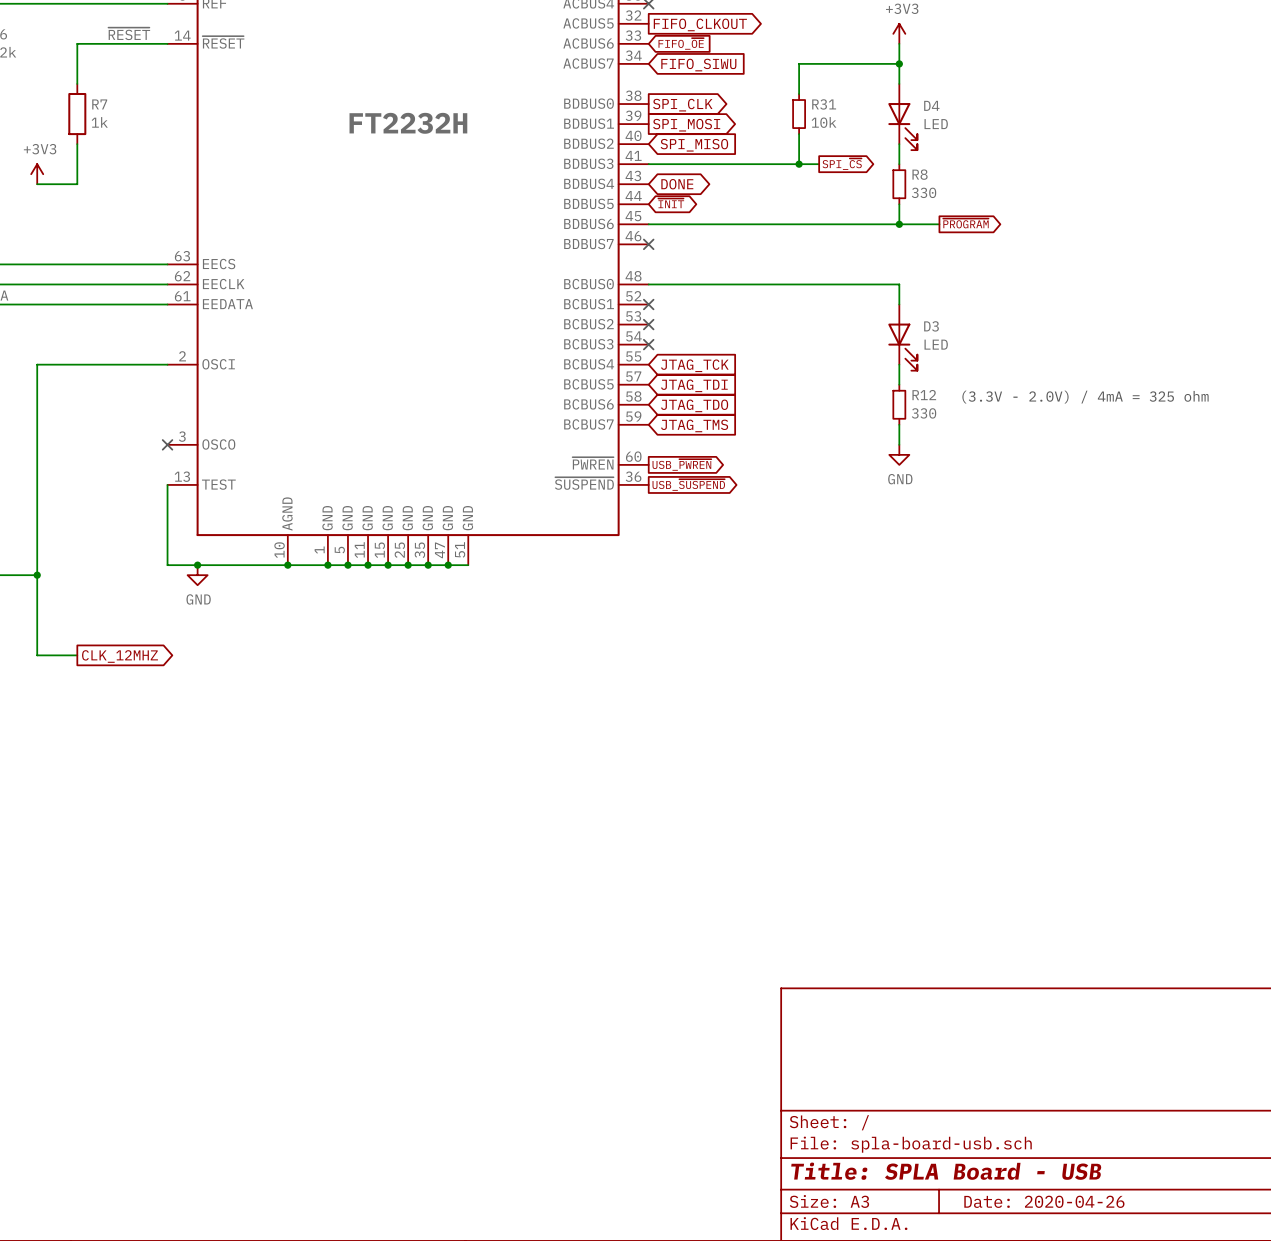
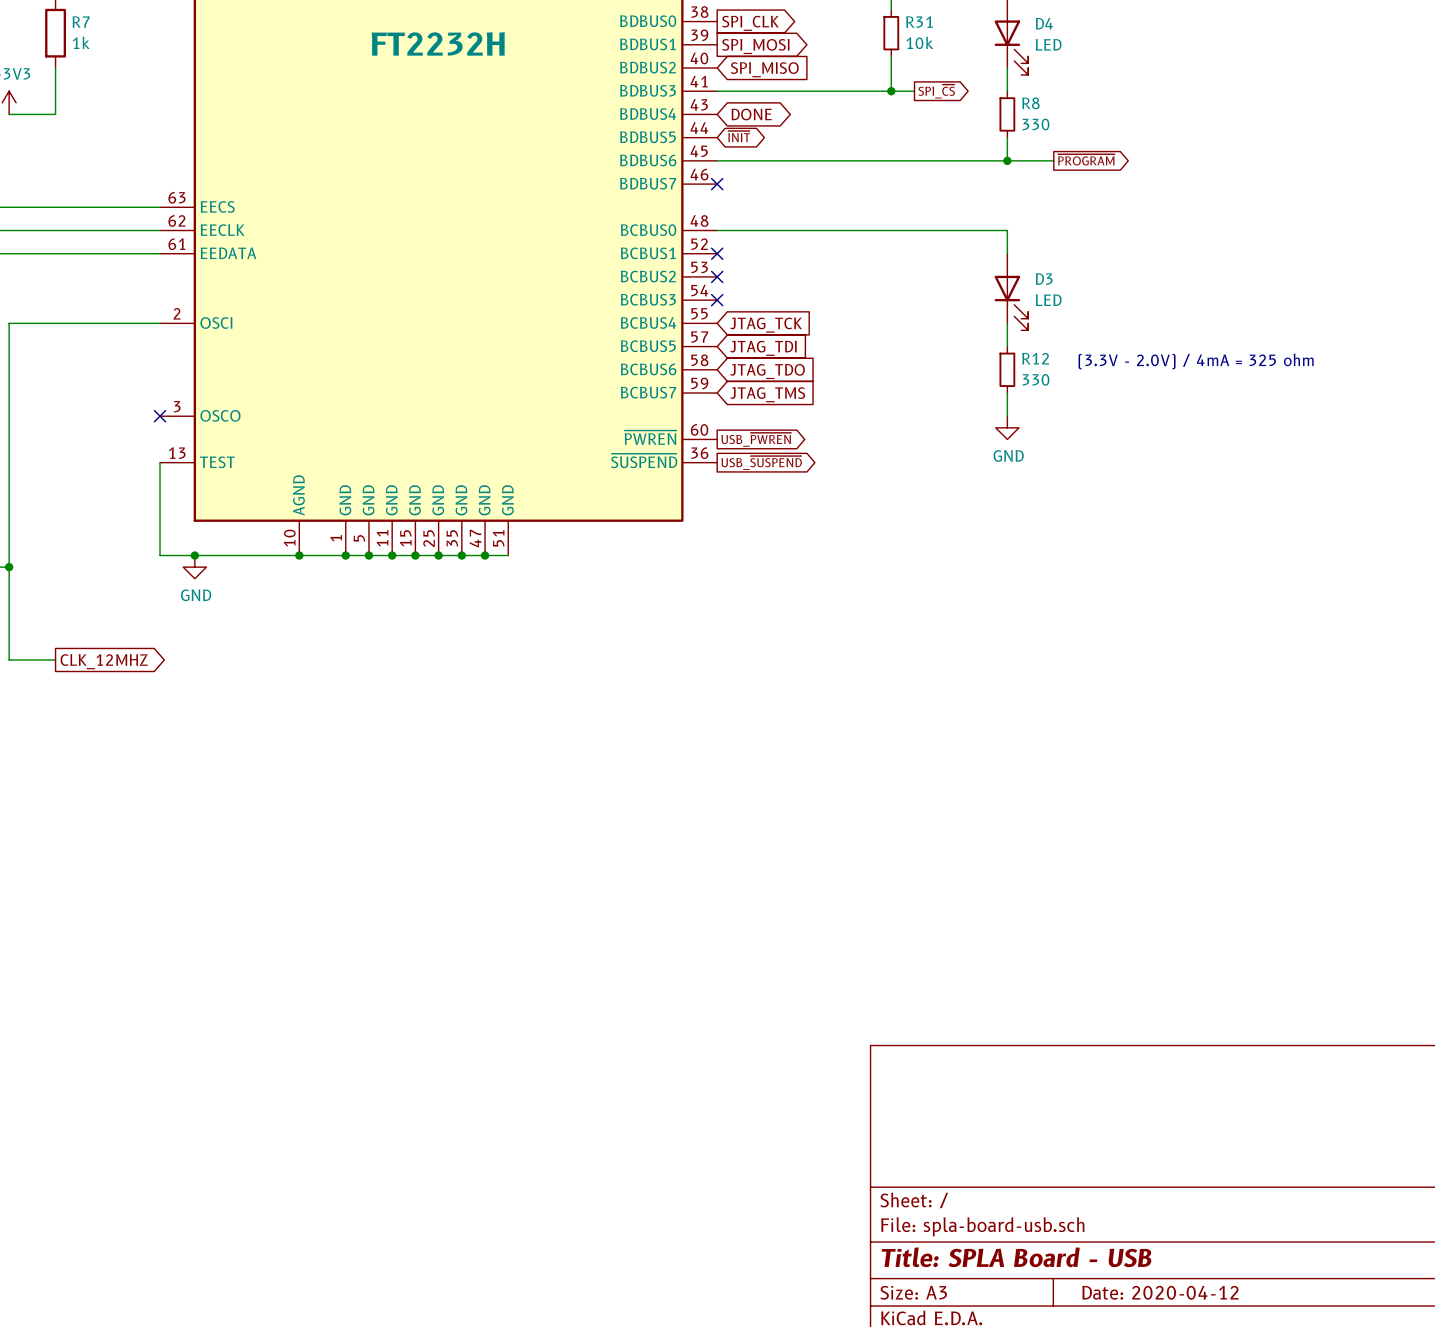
title block: Date: 2020-04-26 (1044, 1201) -> Date: 2020-04-12 (1160, 1292)

